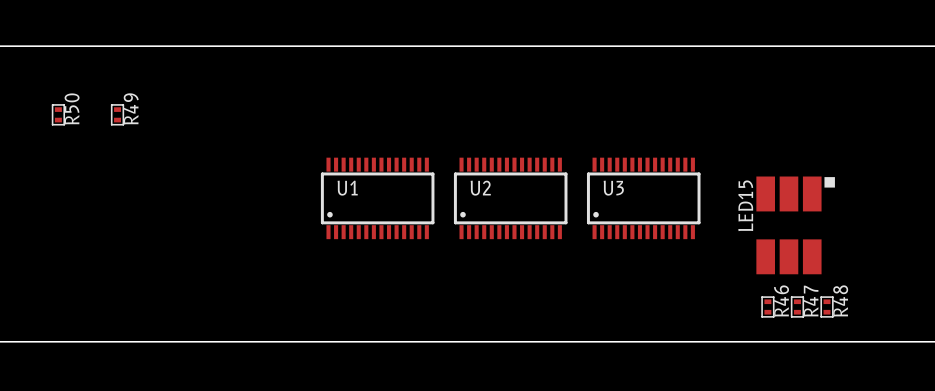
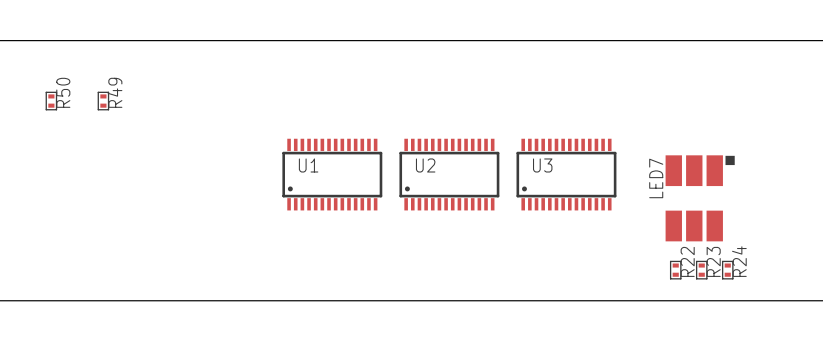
LED15 name: LED15 (745, 205) -> LED7 (656, 178)
R46 name: R46 (781, 301) -> R22 (687, 261)
R47 name: R47 (811, 301) -> R23 (713, 261)
R48 name: R48 (840, 301) -> R24 (739, 261)

